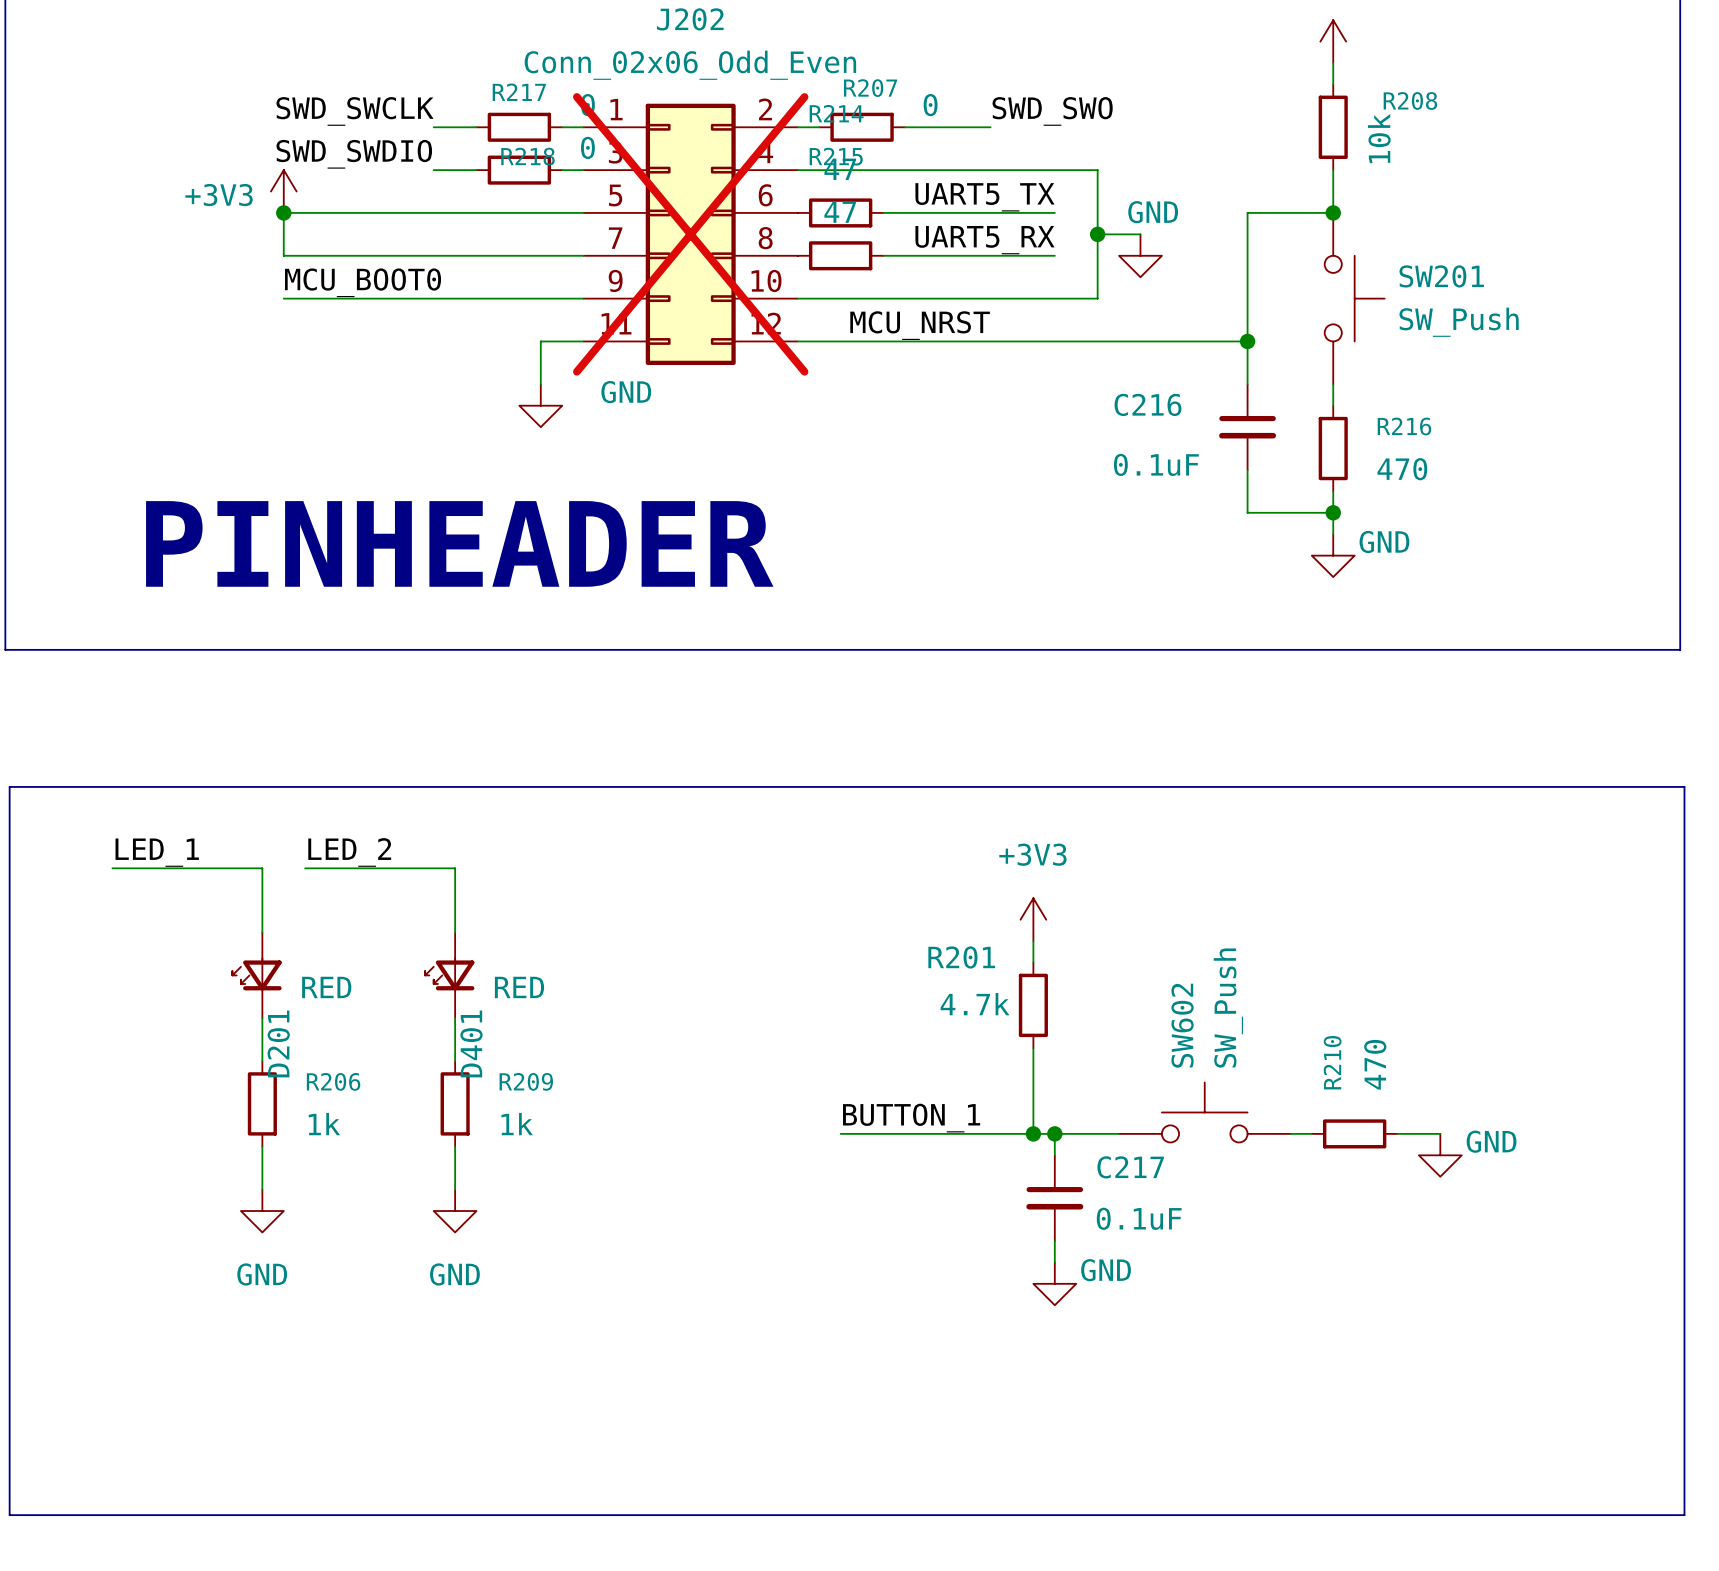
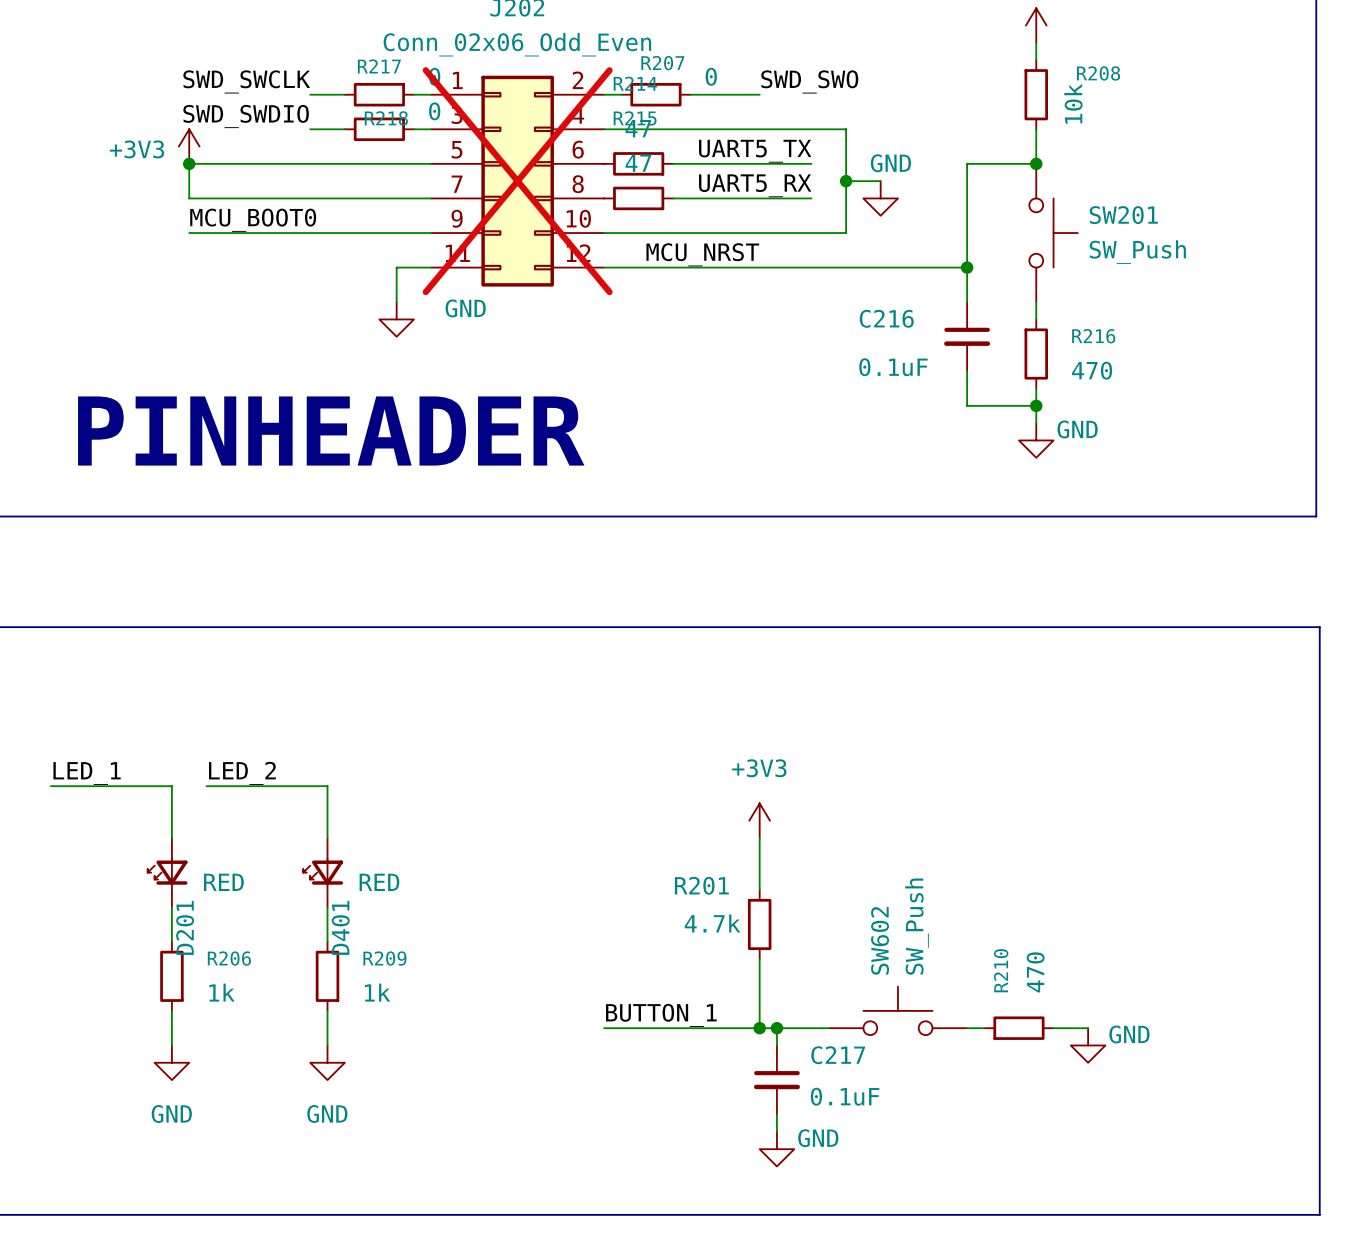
label position: LED_1 (157, 852) -> LED_1 (87, 773)
label position: LED_2 (349, 852) -> LED_2 (242, 773)
wire: (112, 868) (262, 868) (262, 932) -> none
wire: (305, 868) (455, 868) (455, 932) -> none
power symbol position: +3V3 (1033, 919) -> +3V3 (759, 820)
wire: (1033, 941) (1033, 962) -> none
D201 position: (257, 975) -> (167, 872)
D401 position: (449, 975) -> (323, 872)
wire: none -> (50, 786) (171, 786) (171, 813)
wire: none -> (206, 786) (327, 786) (327, 813)
R201 position: (1033, 1005) -> (759, 924)
wire: none -> (759, 838) (759, 889)
wire: (1033, 1048) (1033, 1133) -> (759, 959) (759, 1028)
R206 position: (262, 1103) -> (171, 976)
R209 position: (455, 1103) -> (327, 976)
SW602 position: (1204, 1112) -> (897, 1010)
label position: BUTTON_1 (911, 1118) -> BUTTON_1 (661, 1015)
wire: (840, 1133) (1119, 1133) -> (604, 1028) (828, 1028)
junction: (1033, 1133) -> none
wire: (1054, 1133) (1054, 1155) -> (776, 1028) (776, 1045)
junction: (1054, 1133) -> none
wire: (1290, 1133) (1311, 1133) -> (967, 1028) (984, 1028)
R210 position: (1354, 1133) -> (1018, 1028)
wire: (1397, 1133) (1440, 1133) -> (1053, 1028) (1088, 1028)
power symbol position: GND (1440, 1155) -> GND (1088, 1045)
C217 position: (1054, 1198) -> (776, 1080)
power symbol: GND (262, 1211) -> none
power symbol: GND (455, 1211) -> none
wire: (1054, 1240) (1054, 1262) -> (776, 1114) (776, 1131)
wire: none -> (171, 1010) (171, 1045)
wire: none -> (327, 1010) (327, 1045)
junction: none -> (759, 1028)
junction: none -> (776, 1028)
power symbol position: GND (1054, 1283) -> GND (776, 1149)
power symbol: none -> GND (171, 1062)
power symbol: none -> GND (327, 1062)

